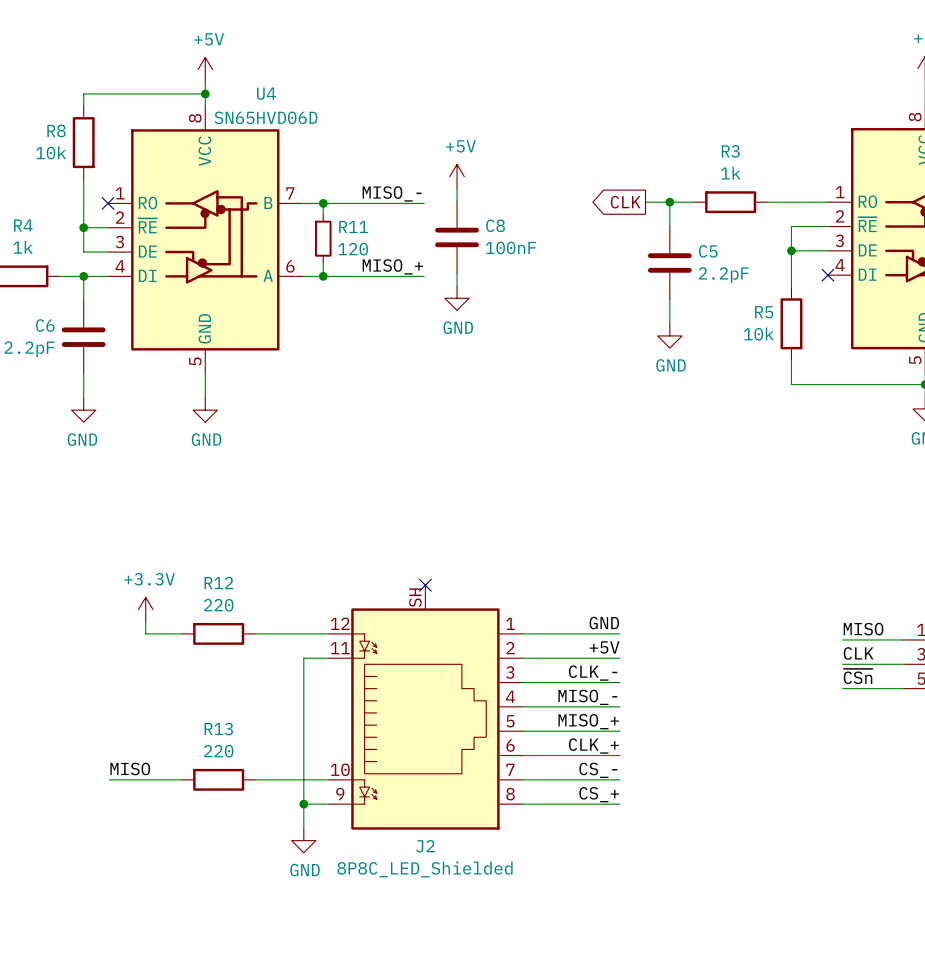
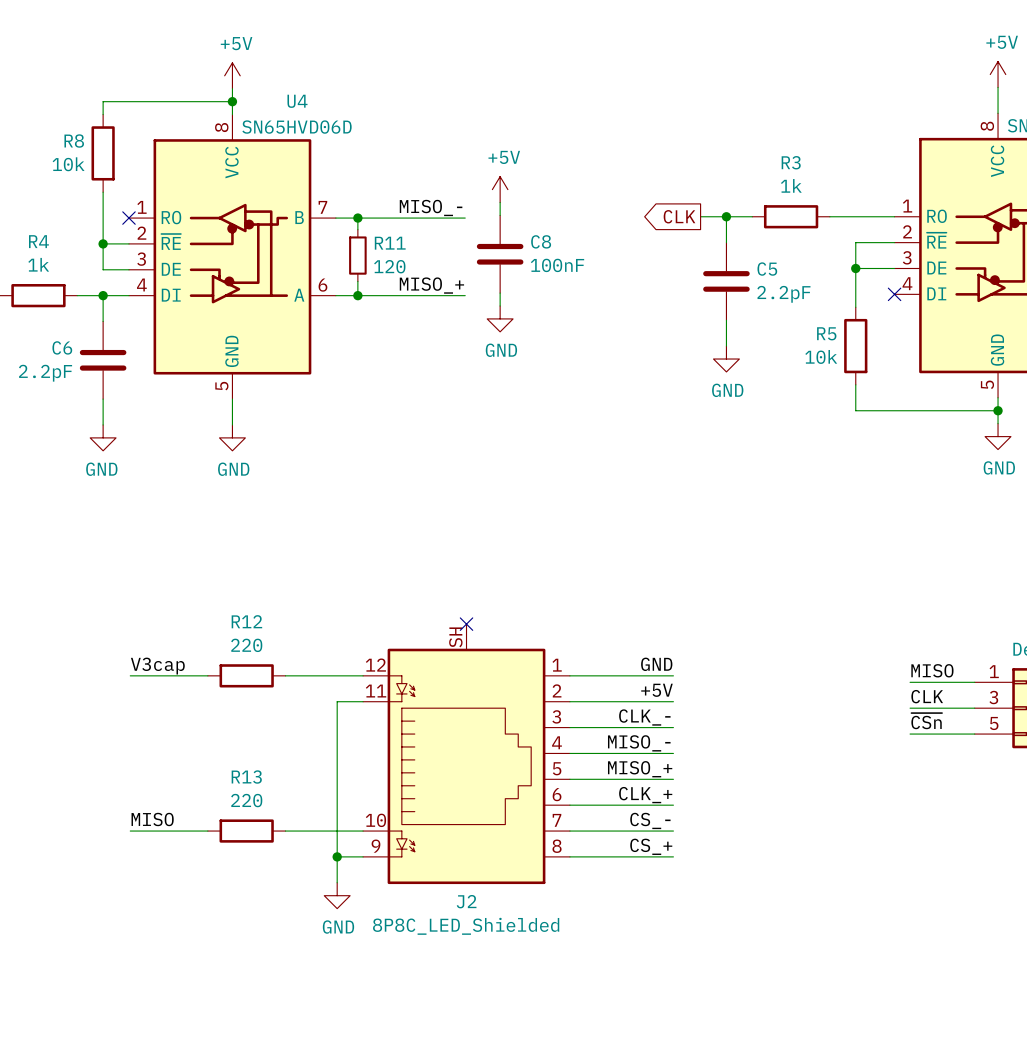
power symbol: +3.3V (145, 609) -> none
wire: (145, 621) (145, 633) -> (130, 675) (169, 675)
label: none -> V3cap (157, 666)

